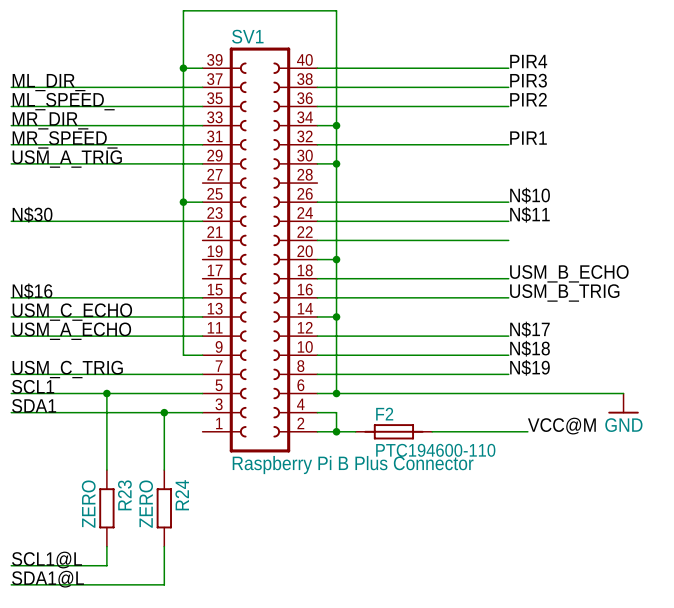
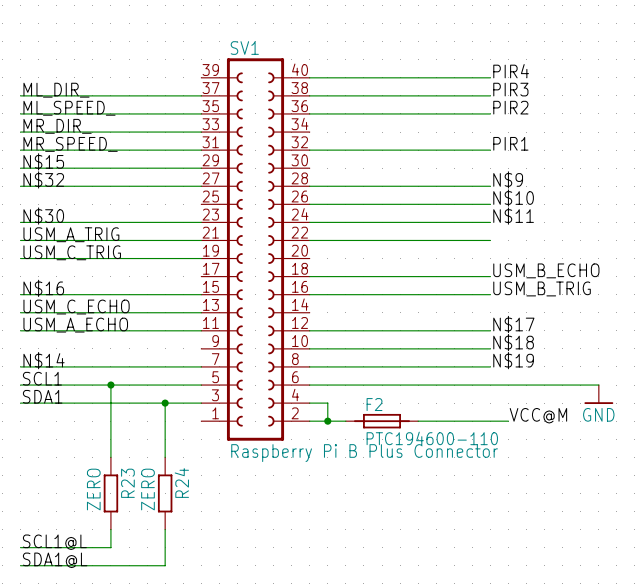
wire: (183, 68) (202, 68) -> none
junction: (183, 68) -> none
wire: (317, 125) (336, 125) -> none
junction: (336, 125) -> none
label: USM_A_TRIG (67, 159) -> N$15 (43, 161)
wire: (317, 163) (336, 163) -> none
junction: (336, 163) -> none
label: none -> N$32 (43, 179)
label: none -> N$9 (508, 179)
wire: none -> (20, 186) (201, 186)
wire: none -> (309, 186) (490, 186)
wire: (183, 202) (202, 202) -> none
junction: (183, 202) -> none
label: none -> USM_A_TRIG (71, 234)
wire: none -> (20, 240) (201, 240)
label: none -> USM_C_TRIG (72, 252)
wire: none -> (20, 258) (201, 258)
wire: (317, 259) (336, 259) -> none
junction: (336, 259) -> none
wire: (317, 316) (336, 316) -> none
junction: (336, 316) -> none
wire: (202, 355) (183, 355) (183, 10) (336, 10) (336, 393) -> none
label: USM_C_TRIG (67, 369) -> N$14 (44, 360)
junction: (336, 393) -> none

